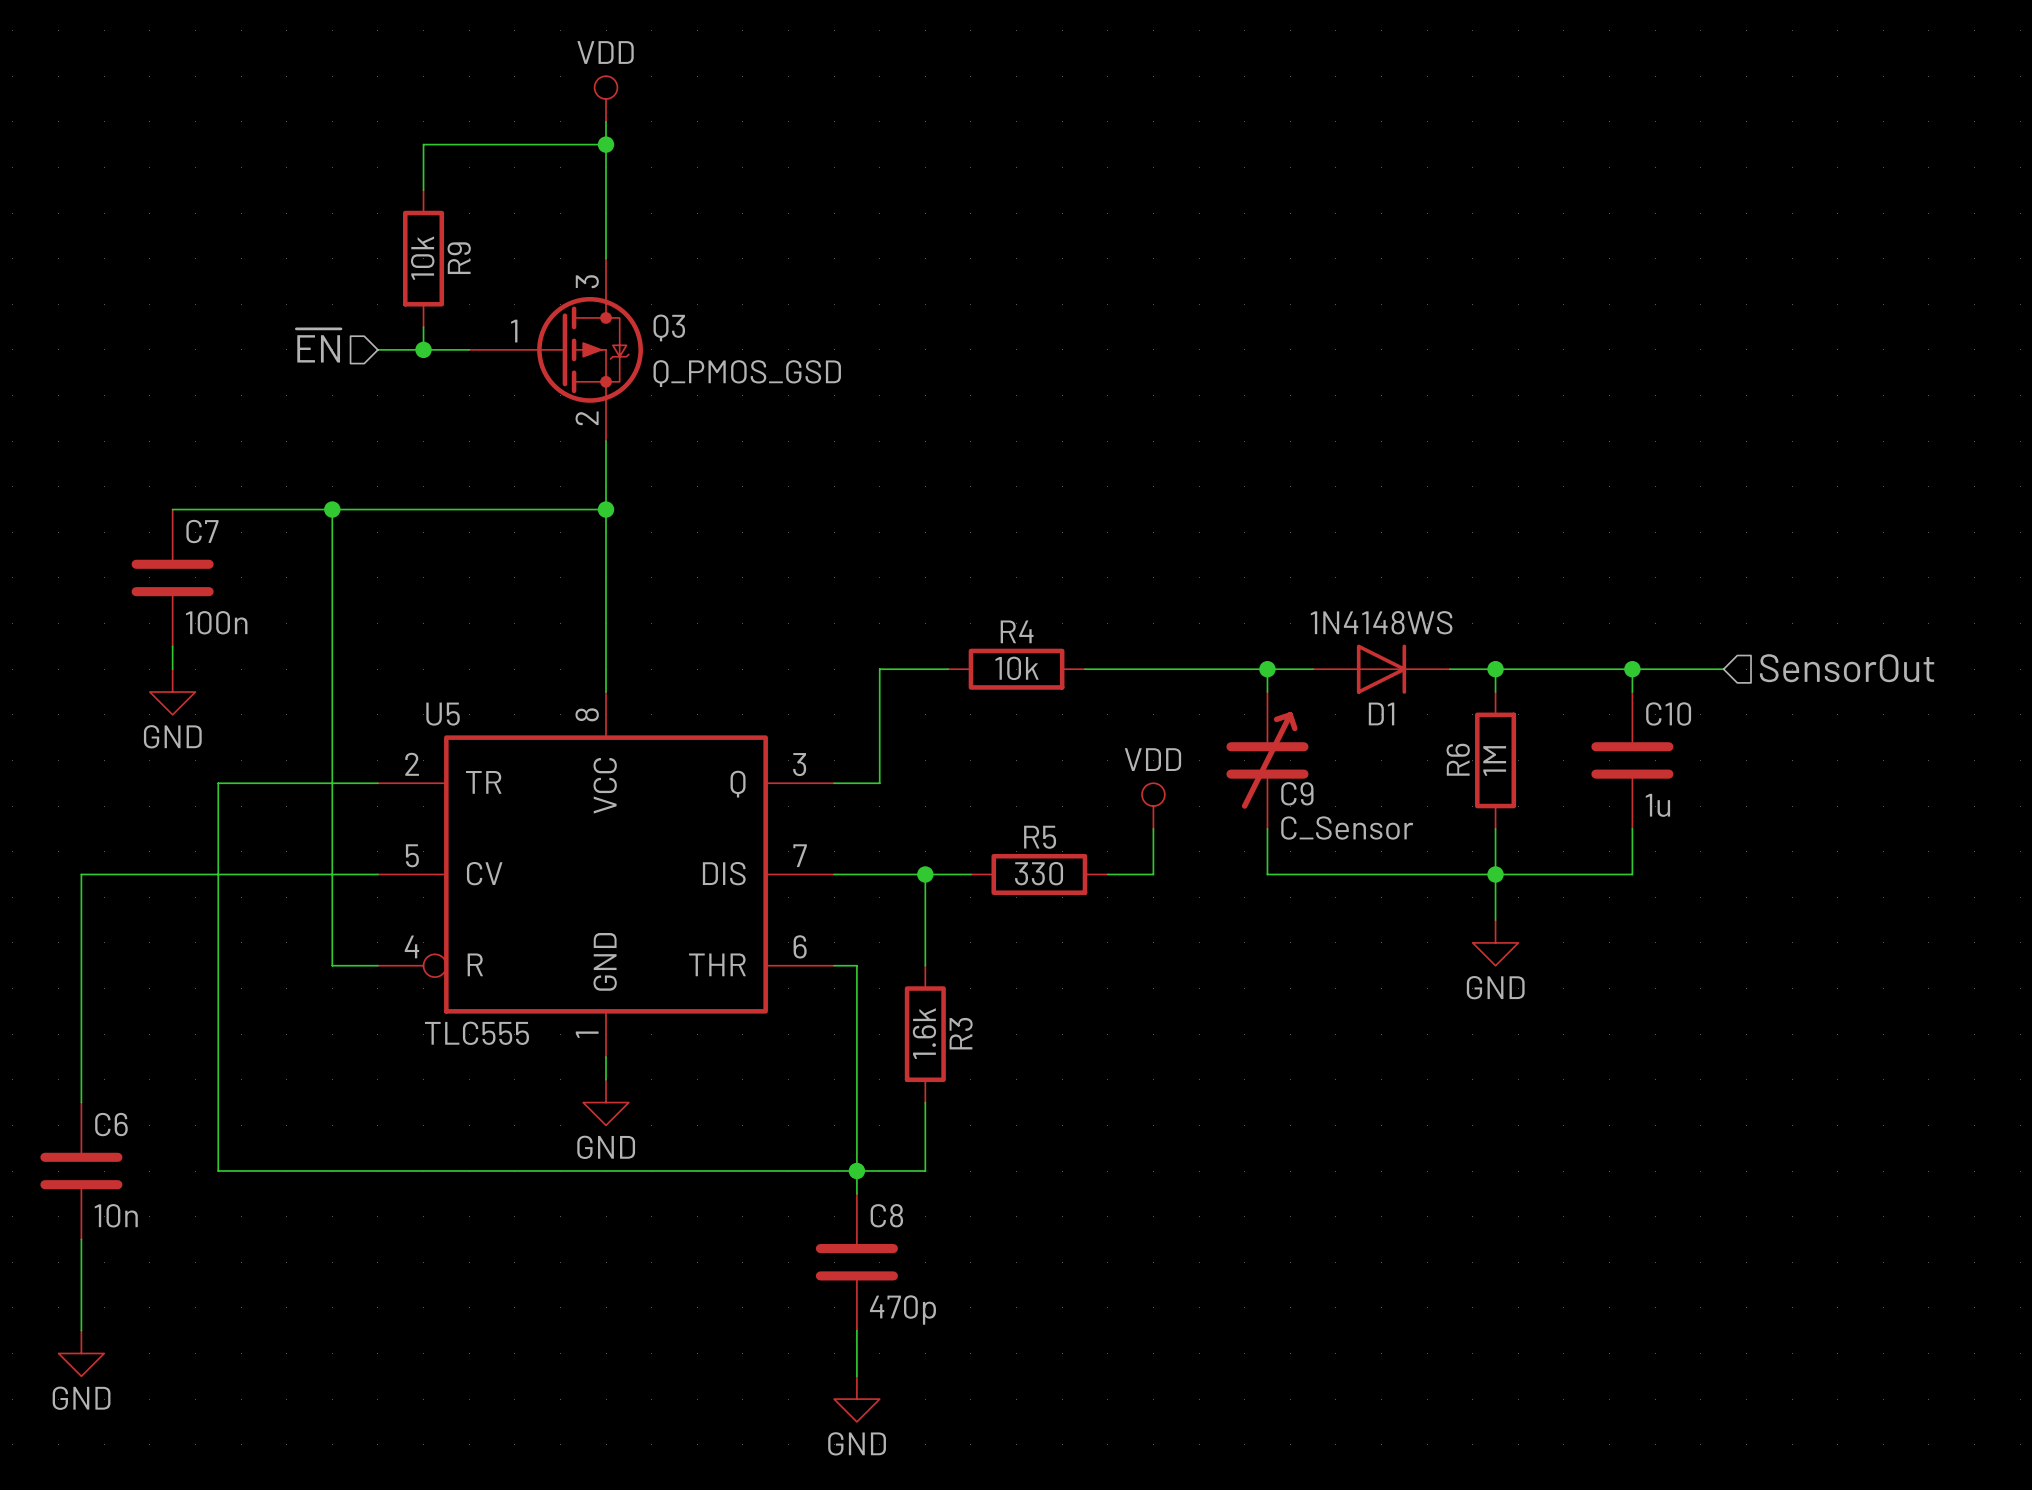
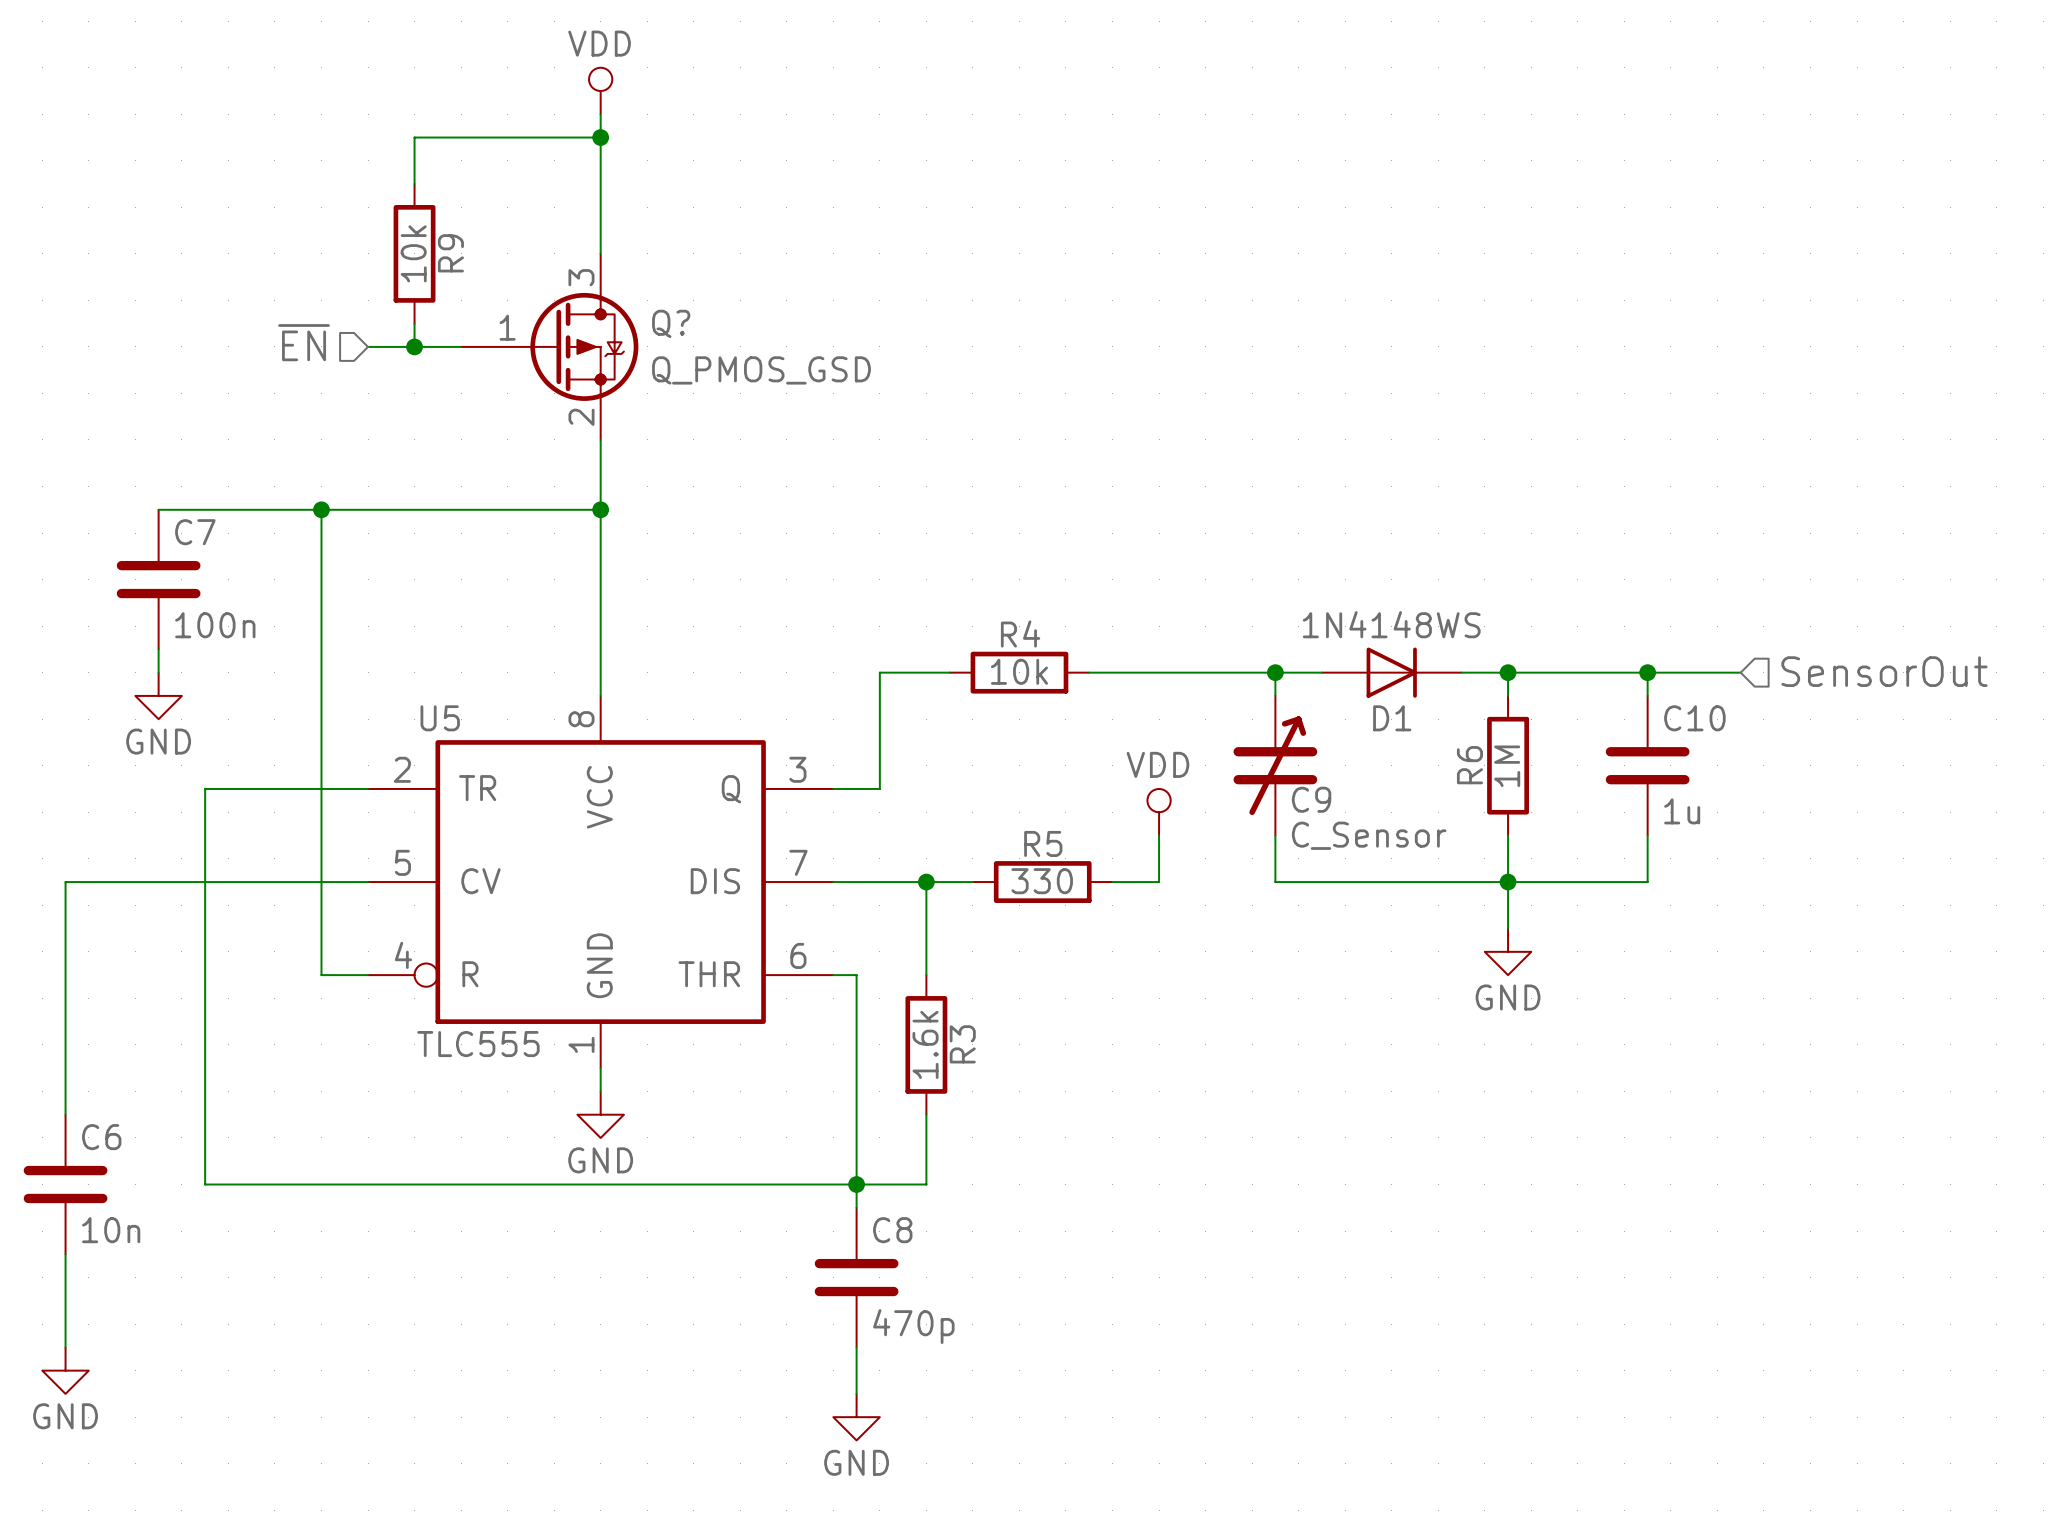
Q3 name: Q3 (669, 327) -> Q? (671, 323)

